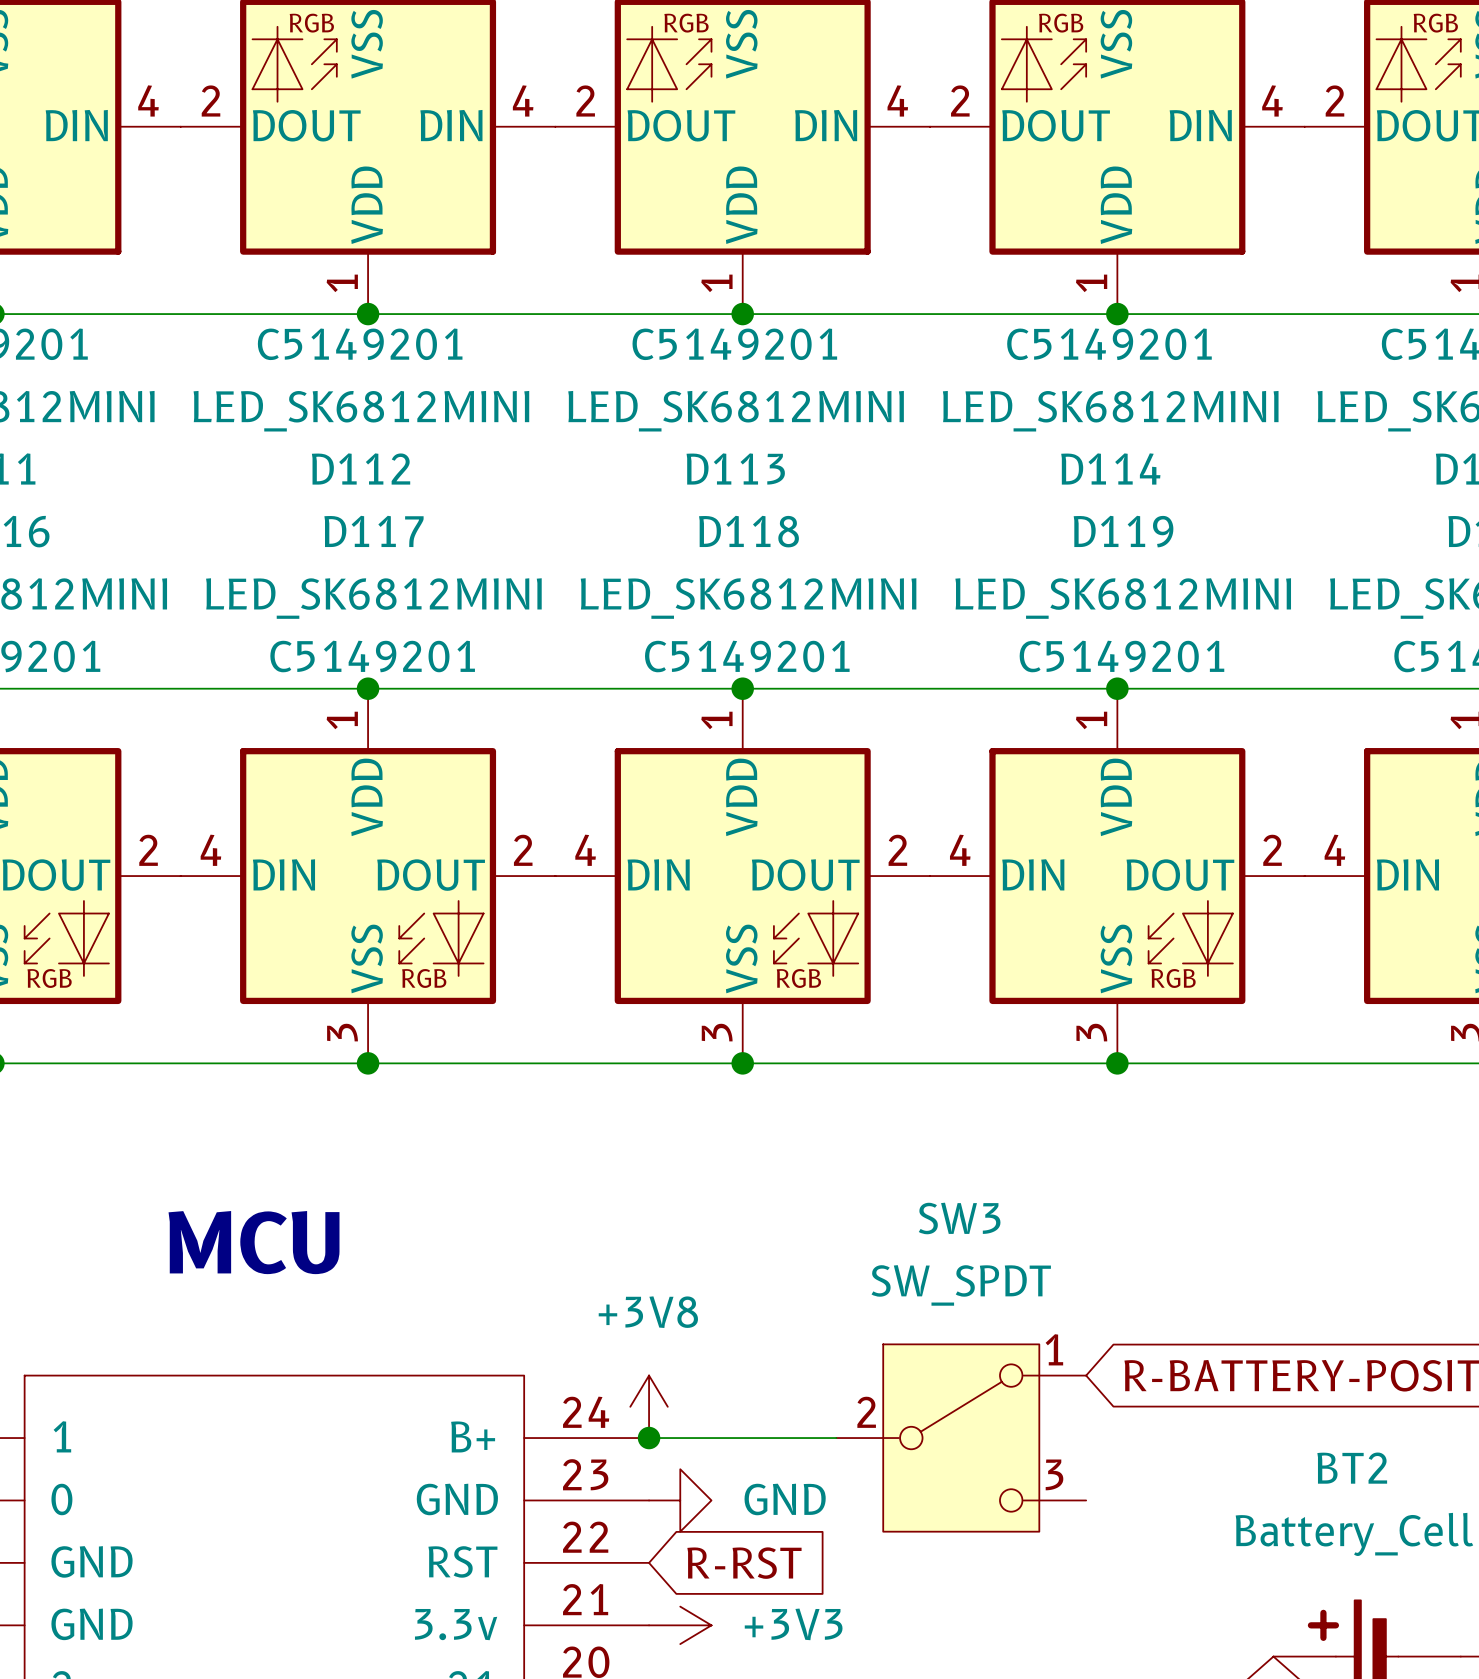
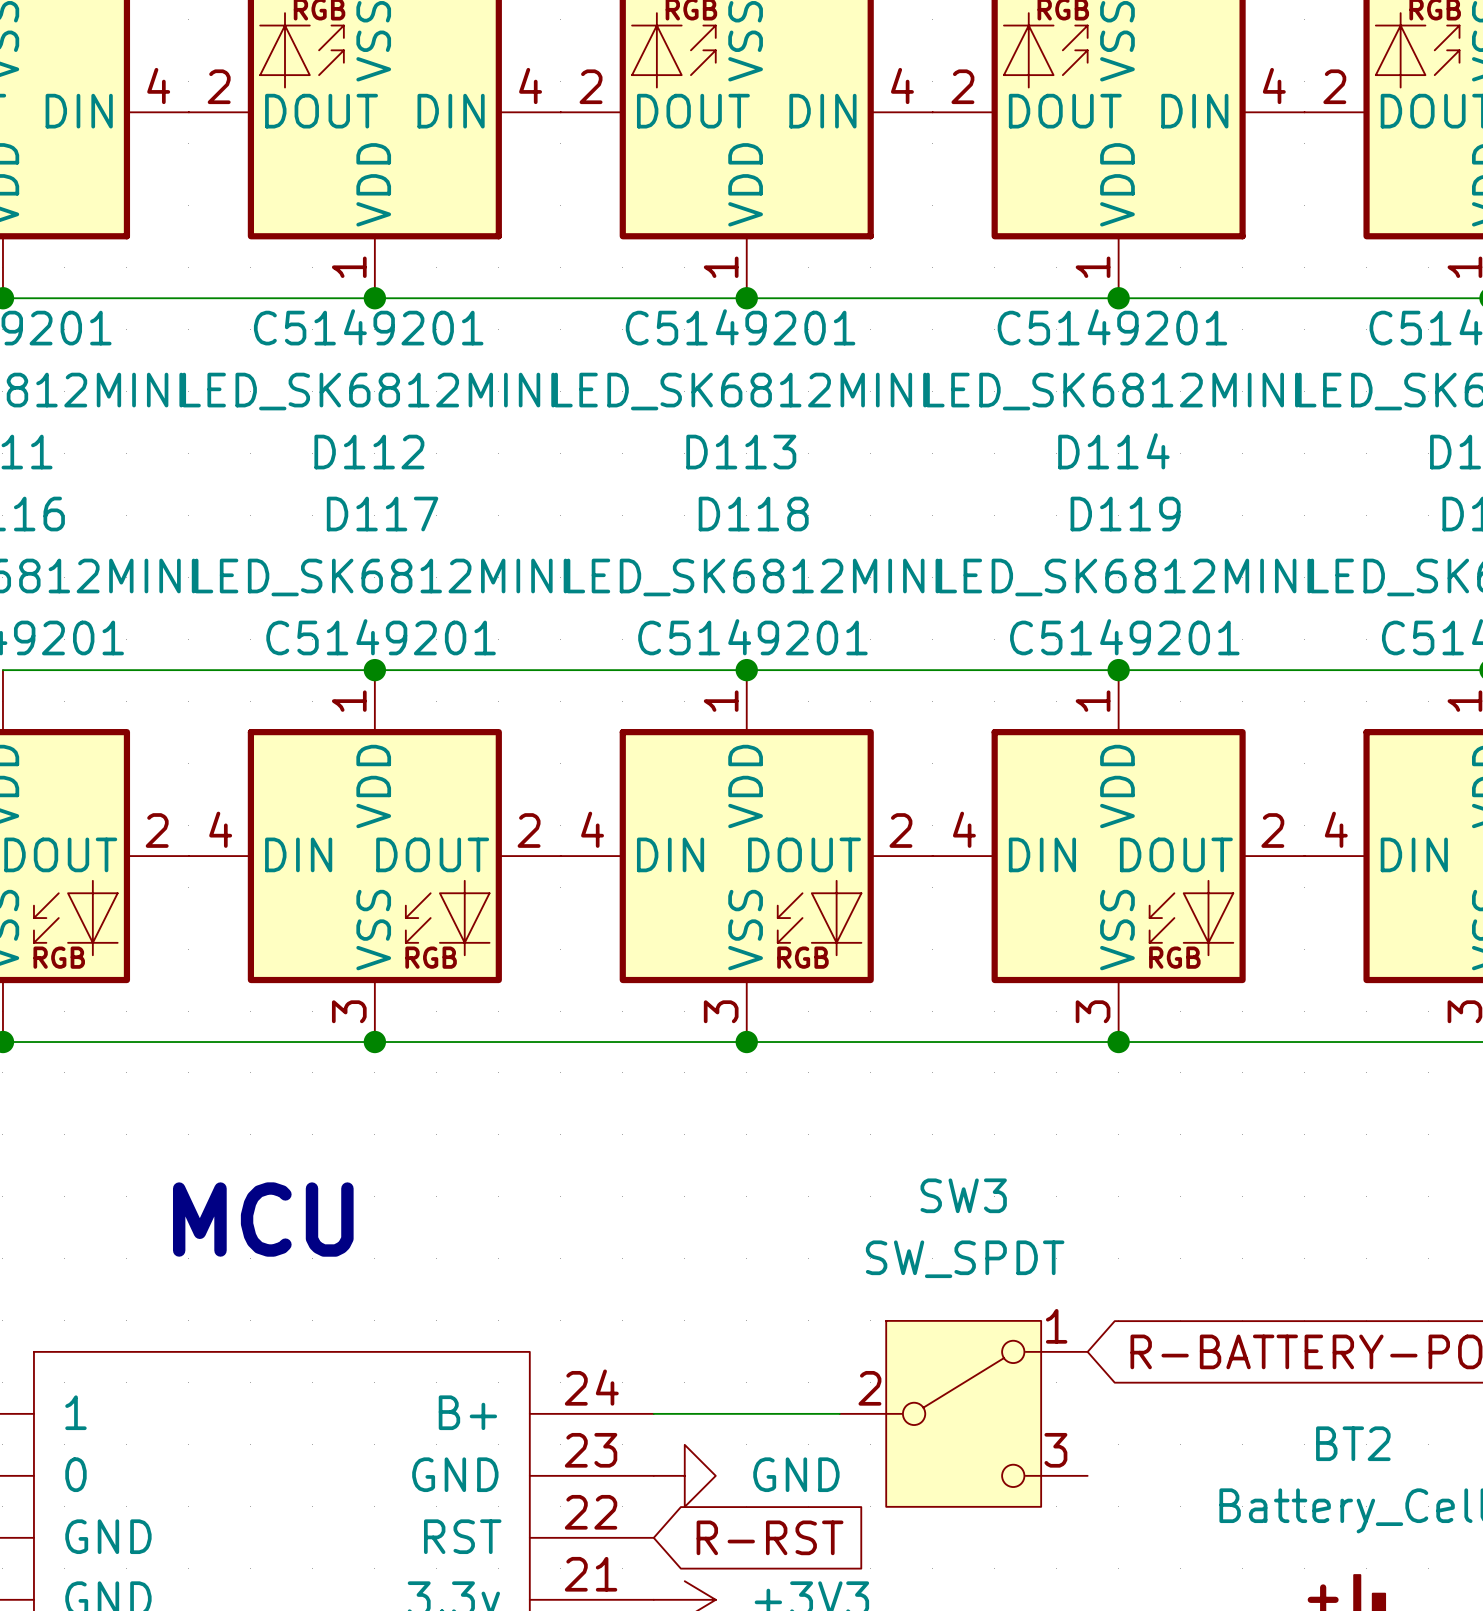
power symbol: +3V8 (649, 1406) -> none
junction: (649, 1438) -> none

